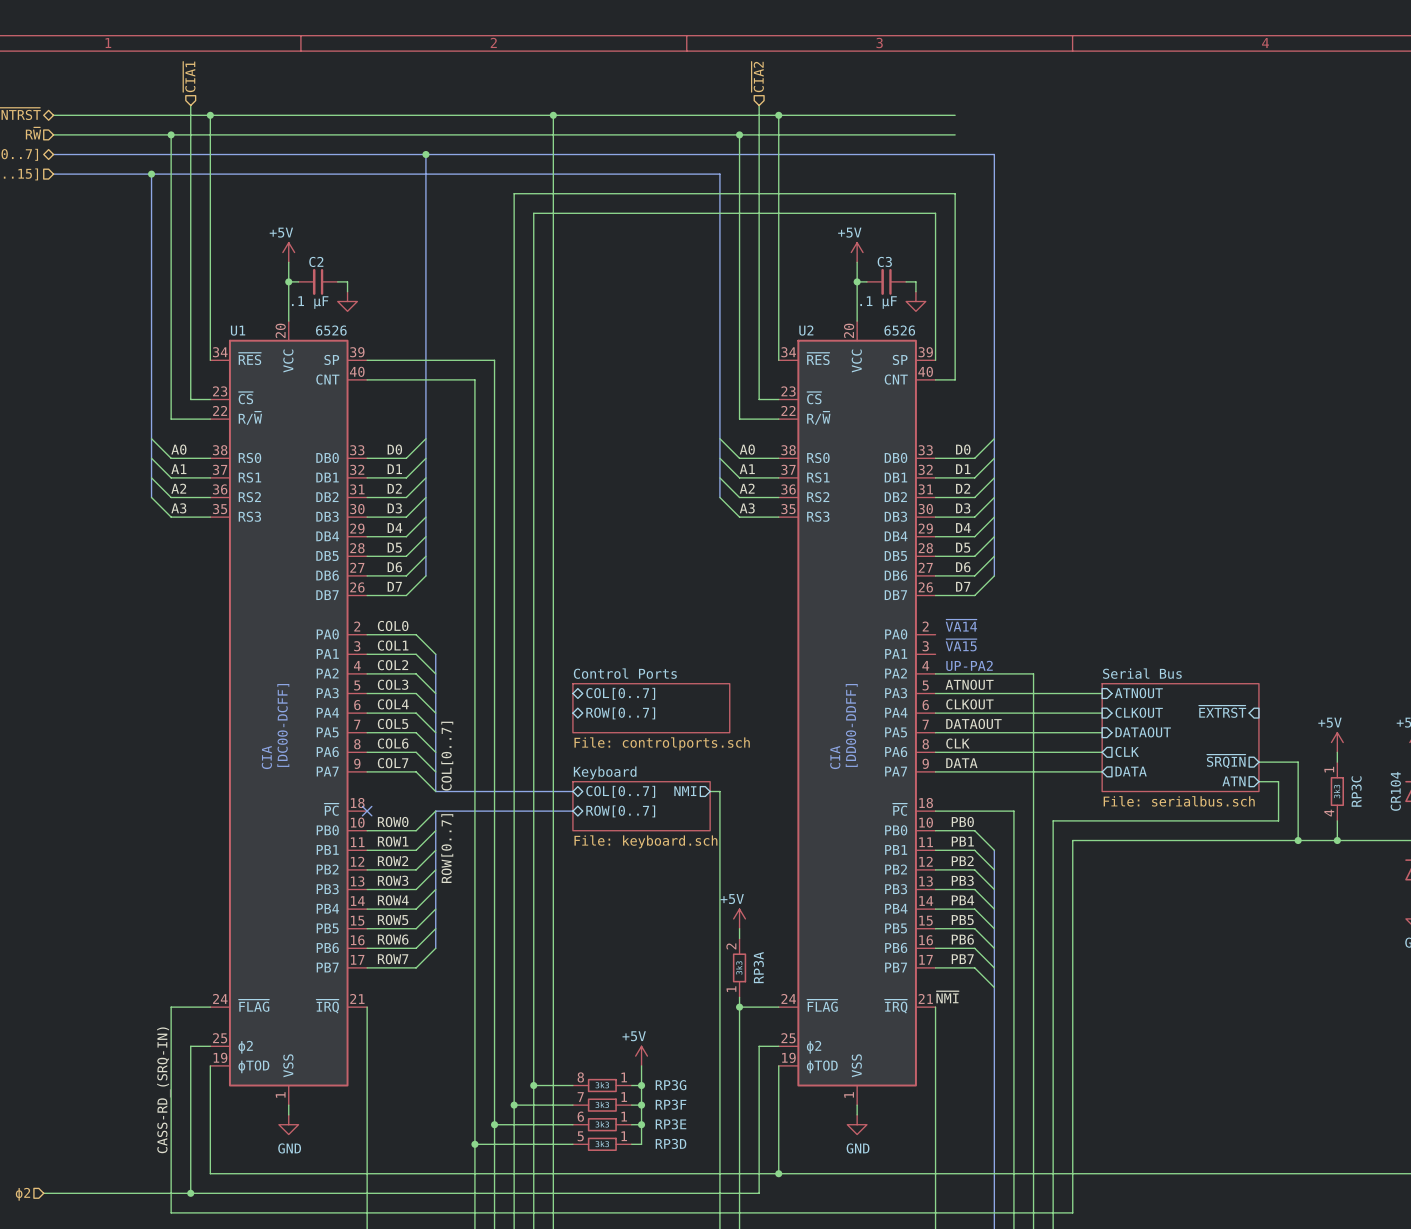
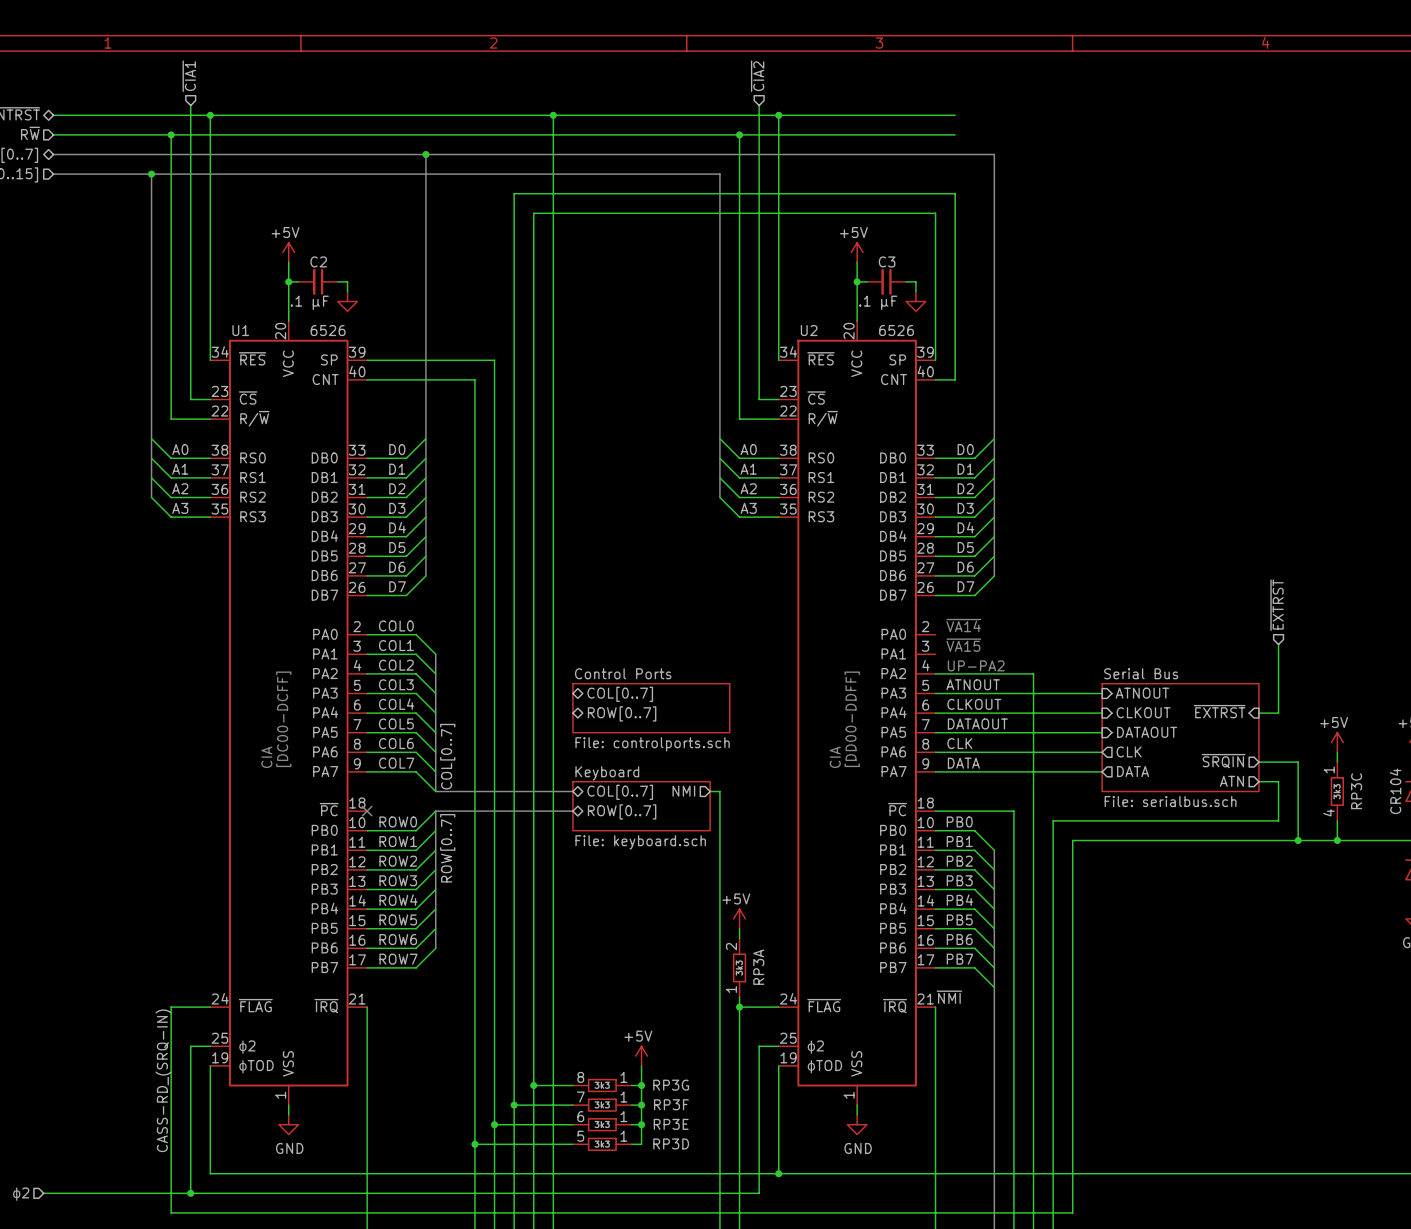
hierarchical label: none -> ~{EXTRST} (1277, 605)
wire: none -> (1278, 644) (1278, 713) (1258, 713)

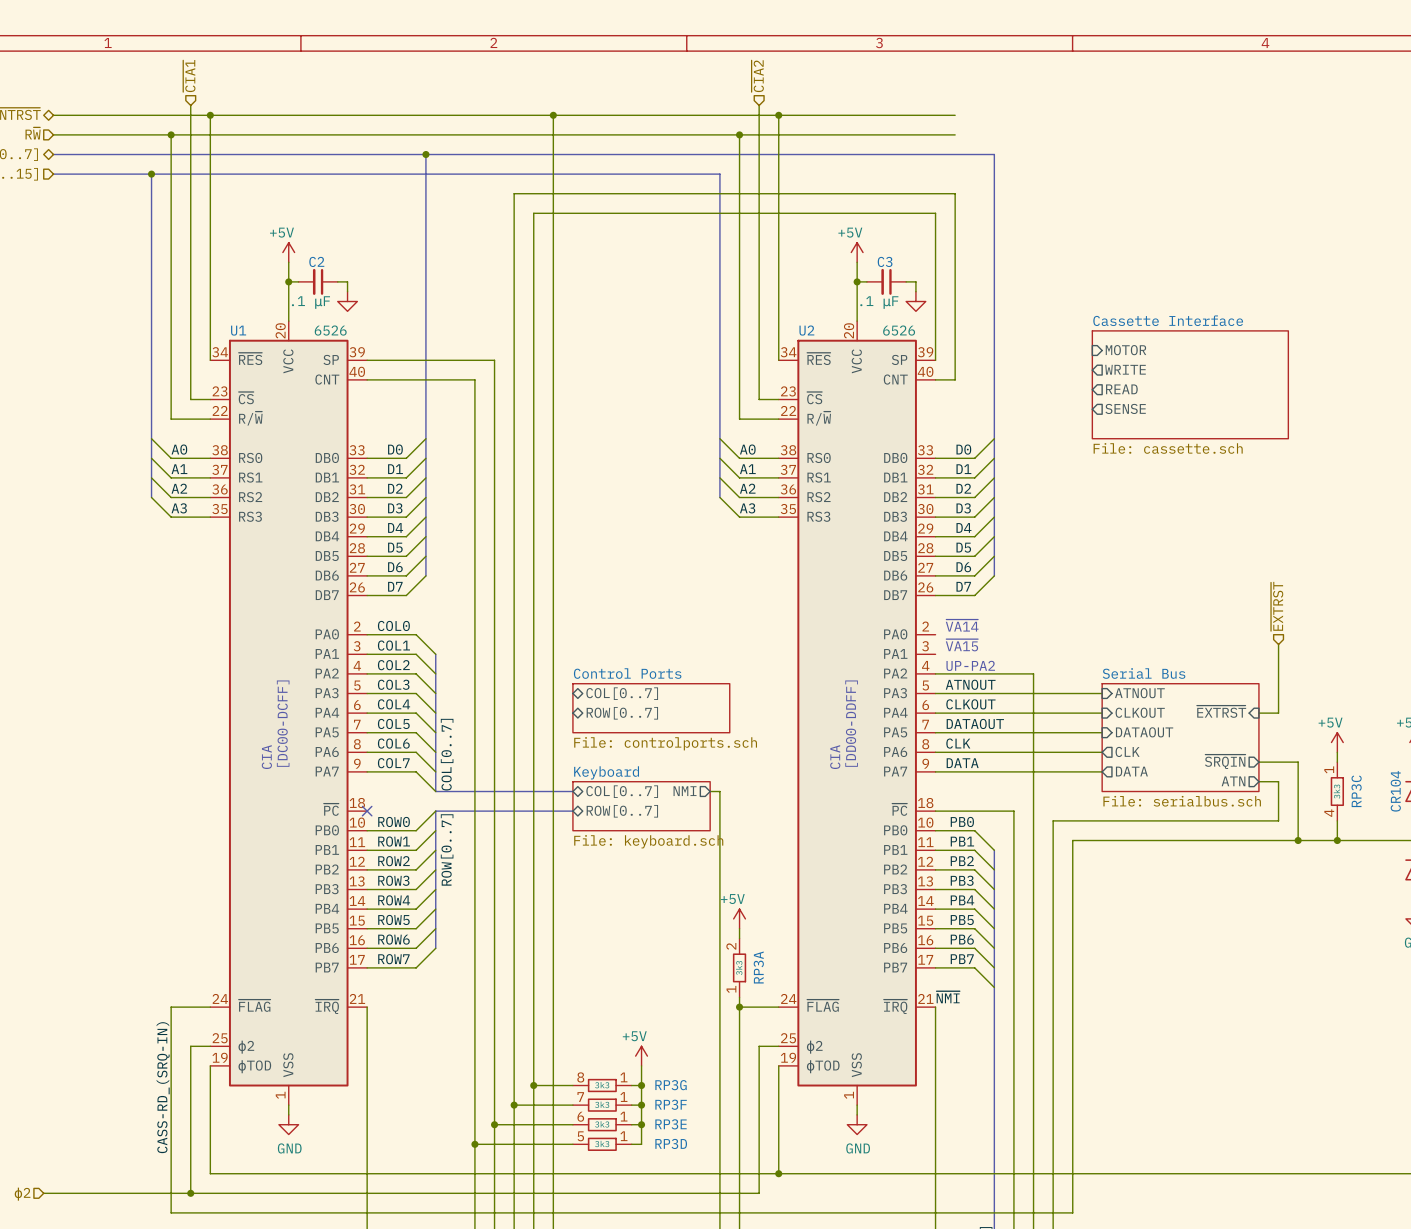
sheet pin: none -> MOTOR (1125, 350)
sheet pin: none -> WRITE (1125, 369)
sheet Cassette Interface: none -> File: cassette.sch (1190, 384)
sheet pin: none -> READ (1121, 389)
sheet pin: none -> SENSE (1125, 408)

